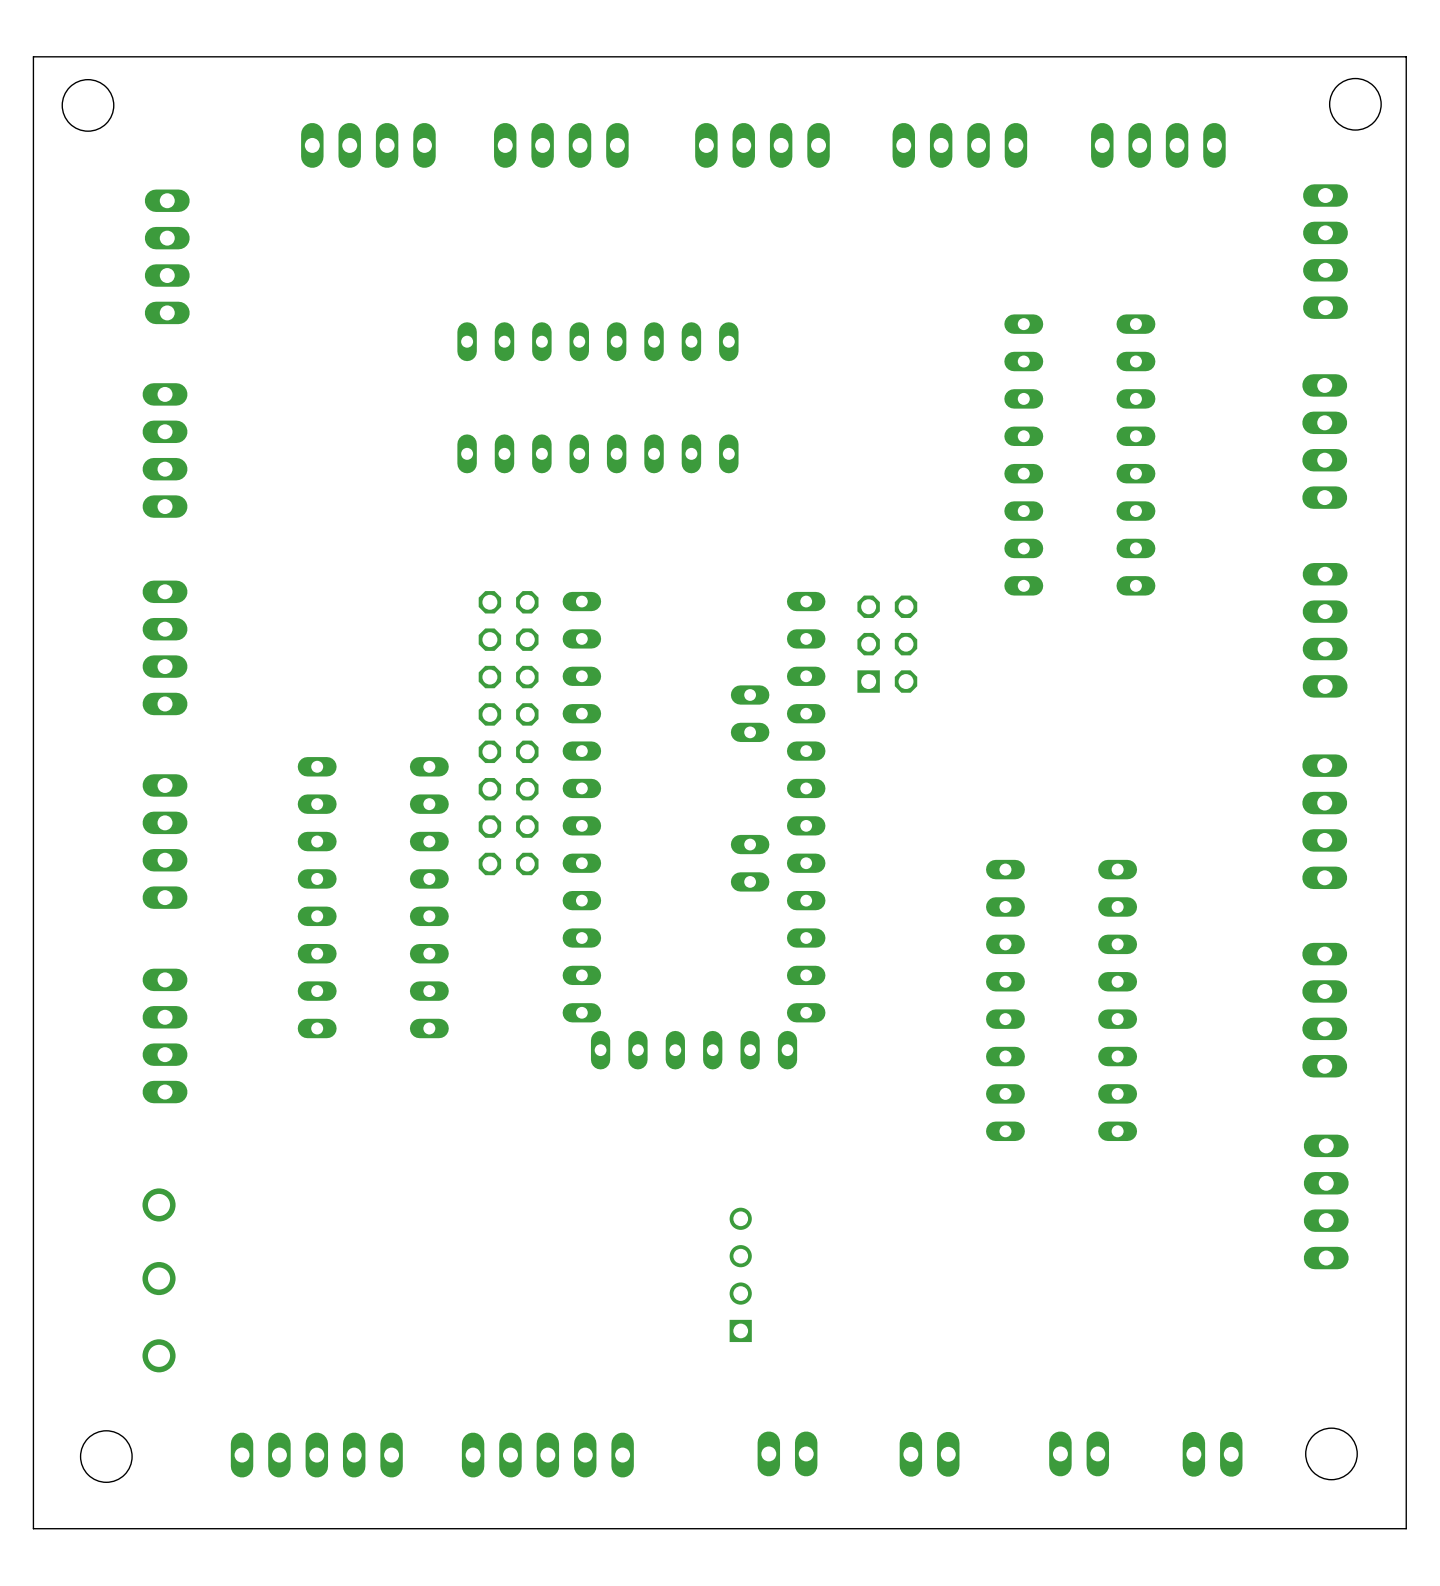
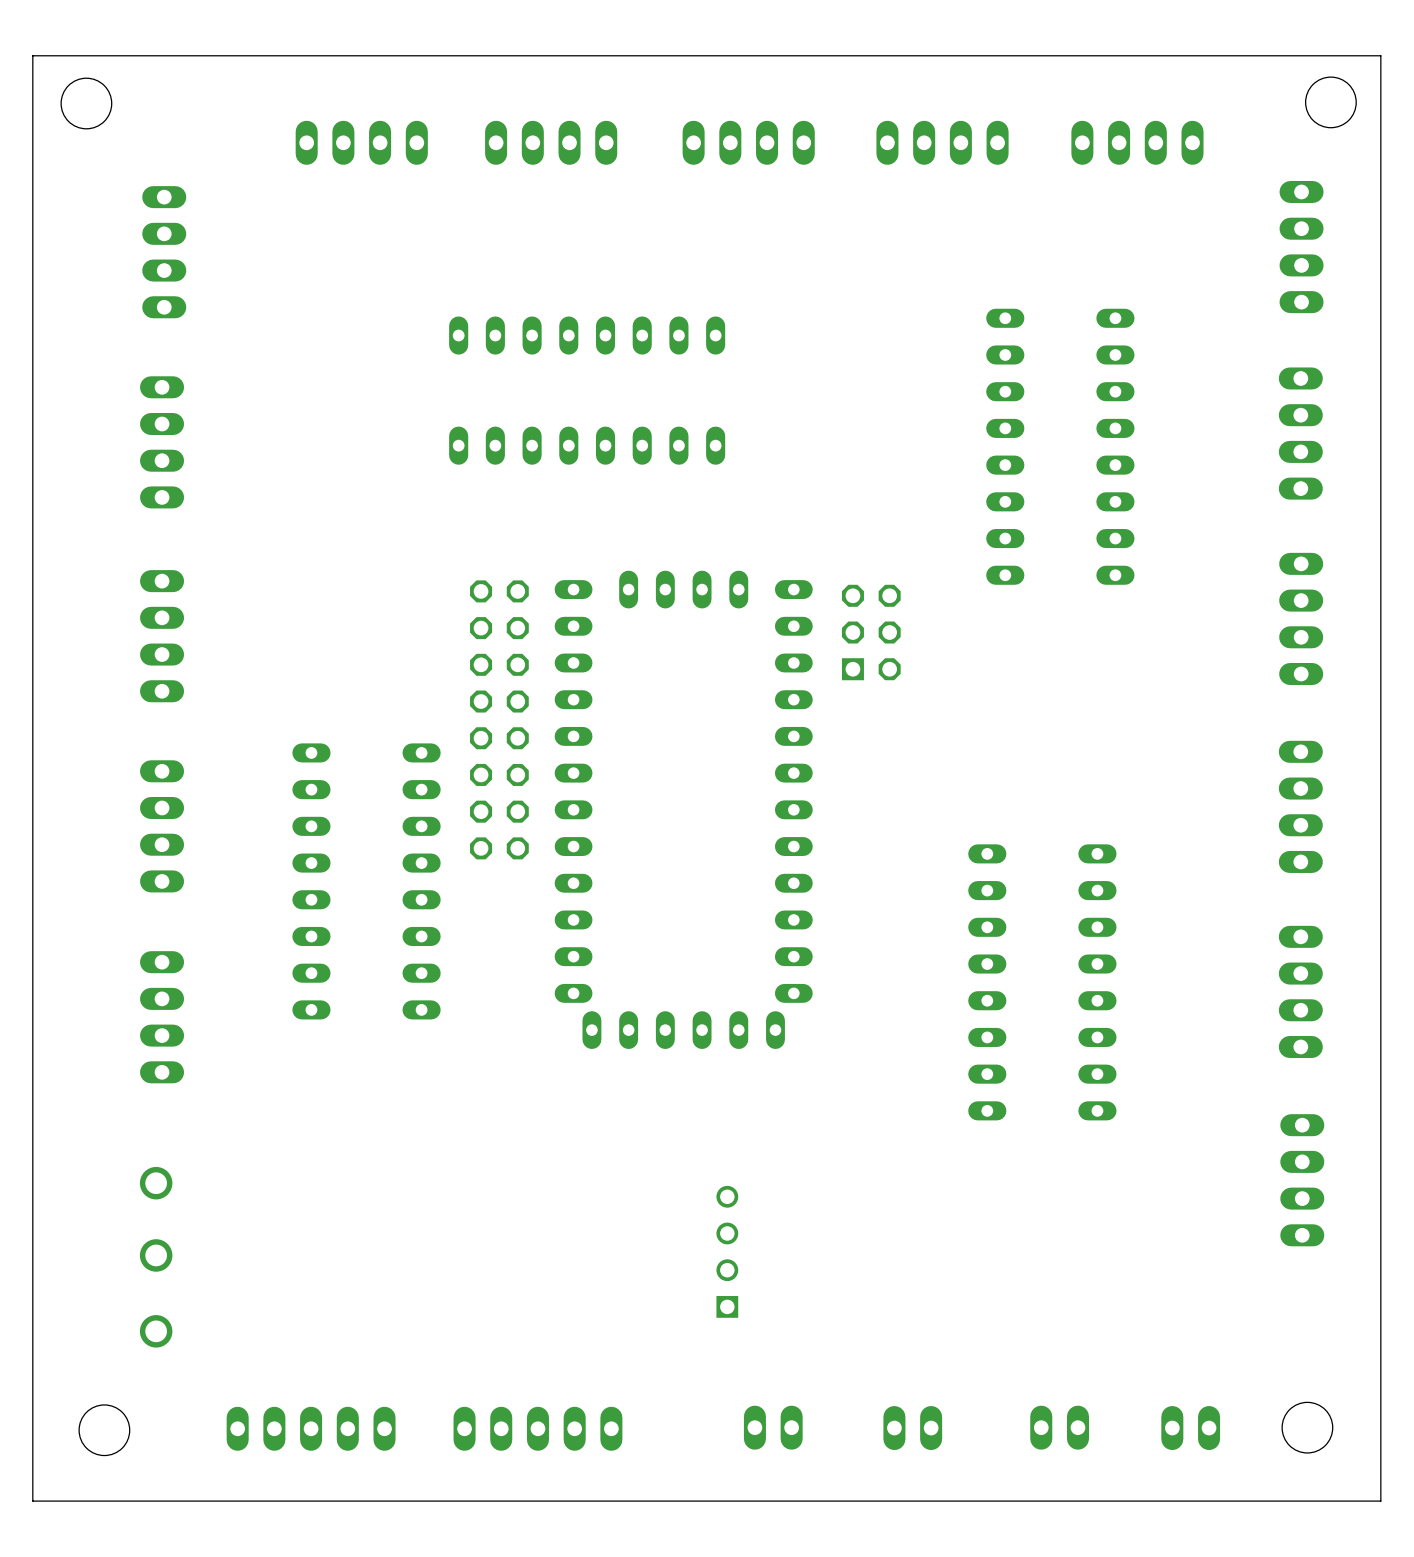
part footprint: [562, 591, 826, 1070] -> [554, 570, 813, 1050]

